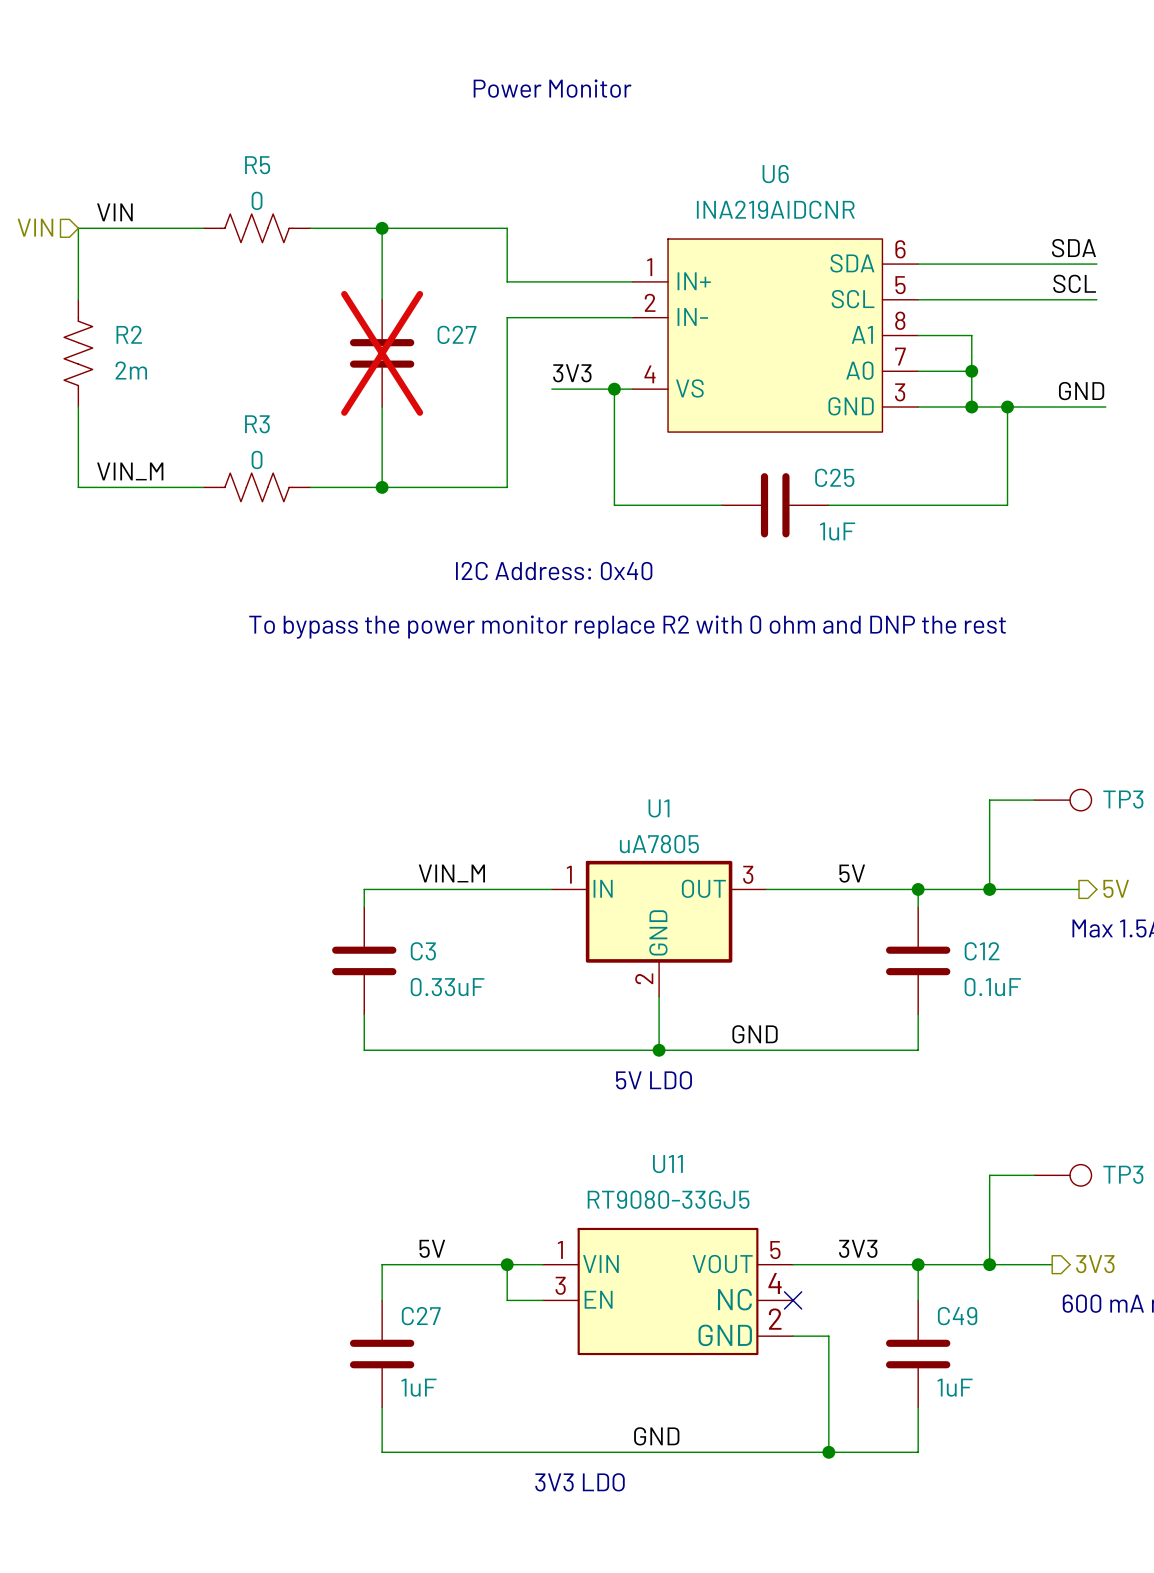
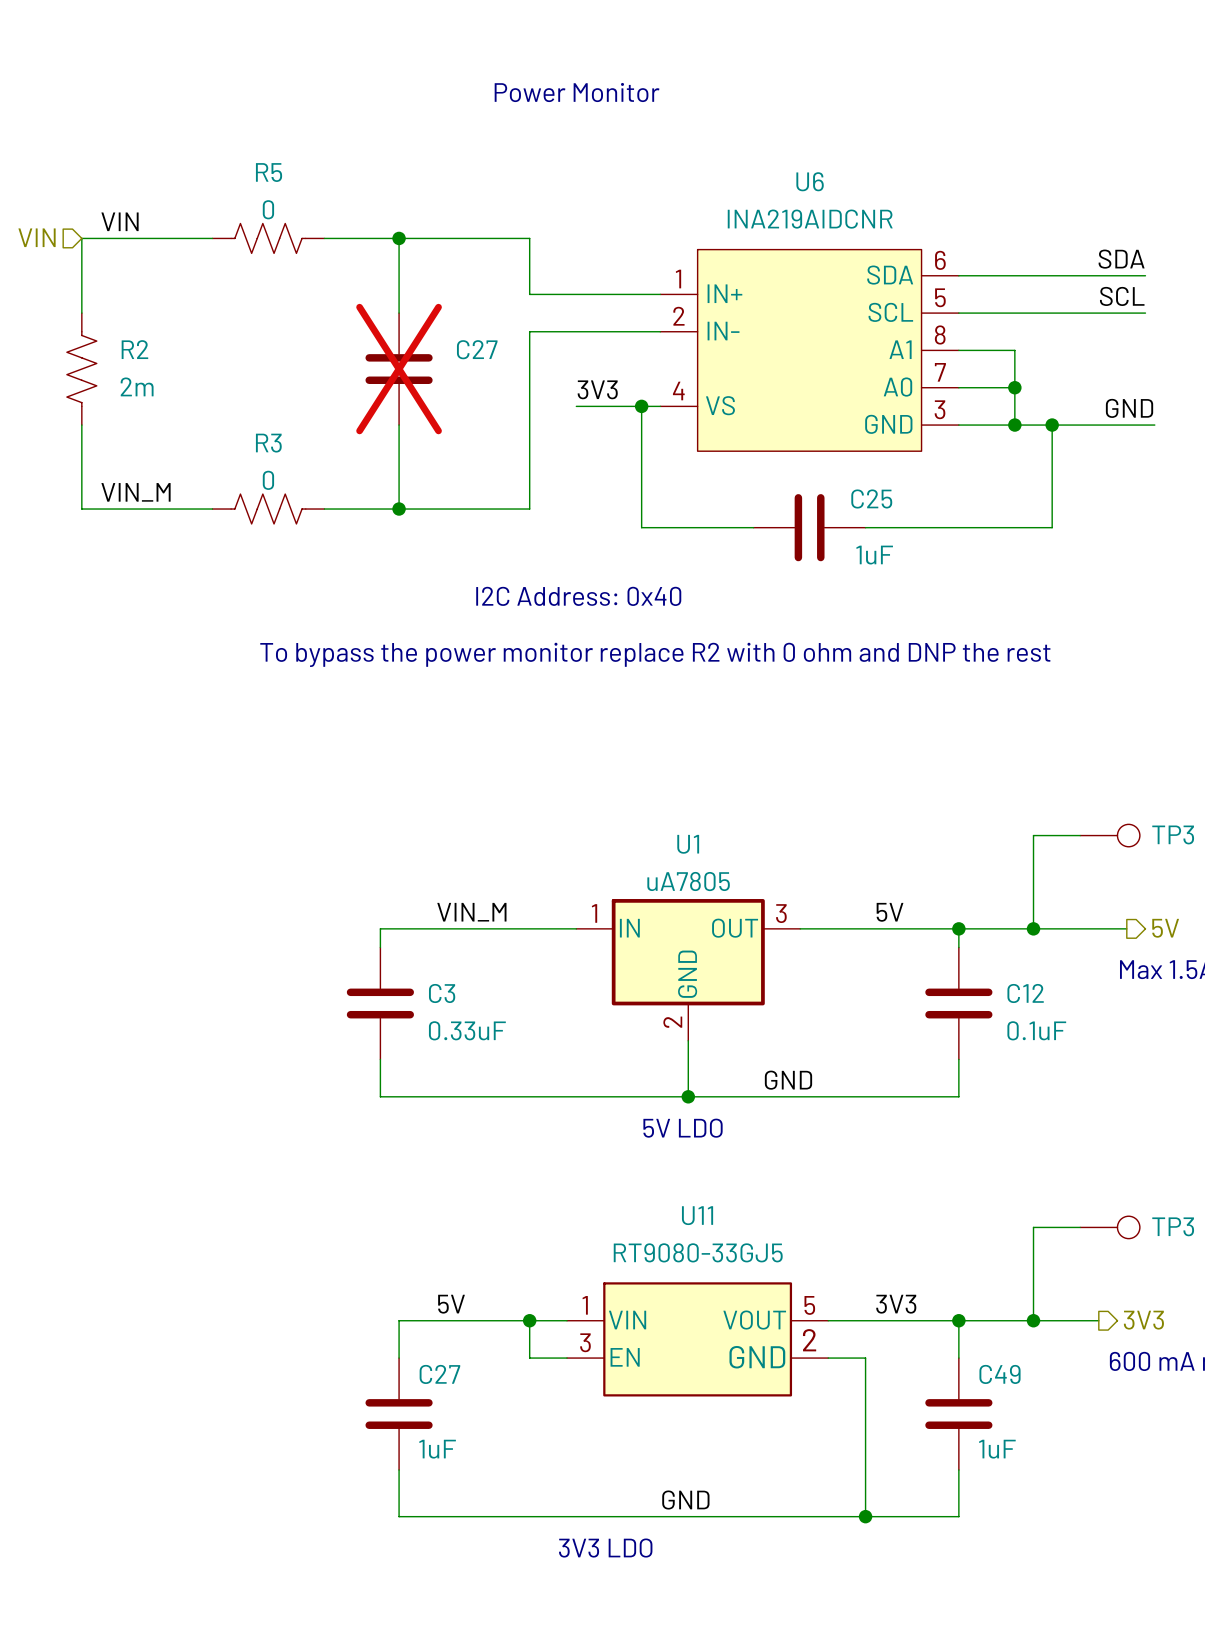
U11 symbol: [542, 1227, 794, 1356] -> [567, 1282, 829, 1397]
no-connect mark: (793, 1300) -> none
wire: (793, 1336) (828, 1336) -> (828, 1358) (865, 1358) (865, 1395)

